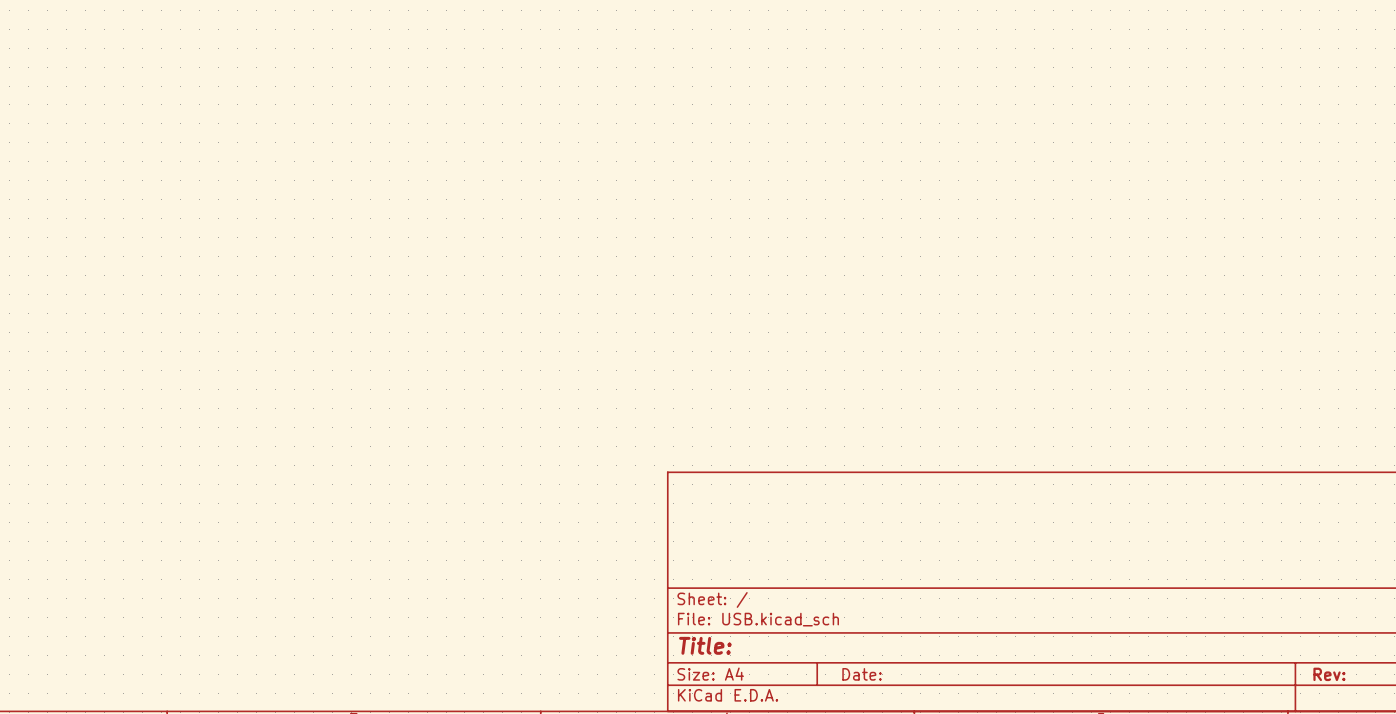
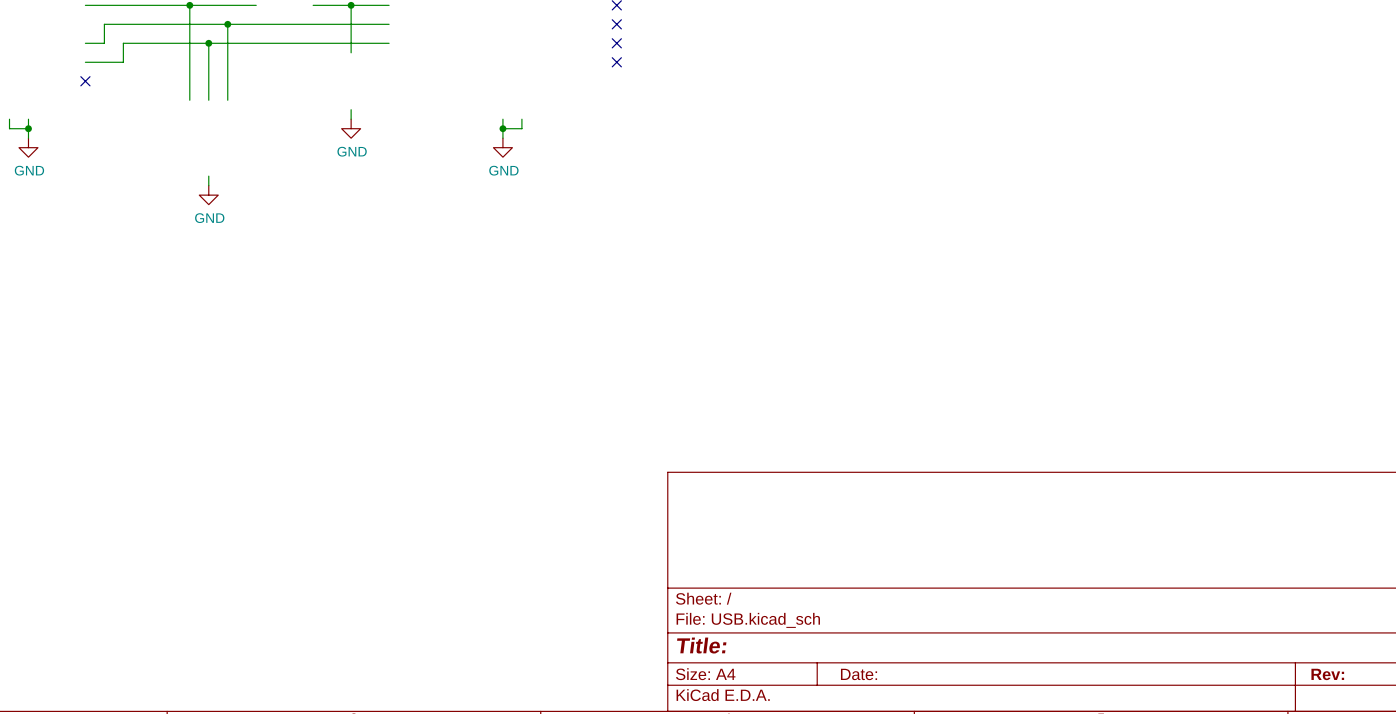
wire: none -> (85, 5) (256, 5)
wire: none -> (189, 5) (189, 100)
junction: none -> (189, 5)
wire: none -> (313, 5) (389, 5)
wire: none -> (351, 5) (351, 52)
junction: none -> (351, 5)
no-connect mark: none -> (616, 5)
wire: none -> (227, 24) (227, 100)
junction: none -> (227, 24)
wire: none -> (389, 24) (104, 24) (104, 43) (85, 43)
no-connect mark: none -> (616, 24)
wire: none -> (208, 43) (208, 100)
junction: none -> (208, 43)
wire: none -> (389, 43) (123, 43) (123, 62) (85, 62)
no-connect mark: none -> (616, 43)
no-connect mark: none -> (616, 62)
no-connect mark: none -> (85, 81)
wire: none -> (351, 109) (351, 119)
wire: none -> (9, 119) (9, 128) (28, 128)
wire: none -> (28, 119) (28, 138)
wire: none -> (502, 119) (502, 138)
wire: none -> (521, 119) (521, 128) (502, 128)
junction: none -> (28, 128)
power symbol: none -> GND (351, 128)
junction: none -> (502, 128)
power symbol: none -> GND (28, 147)
power symbol: none -> GND (502, 147)
wire: none -> (208, 176) (208, 185)
power symbol: none -> GND (208, 195)

